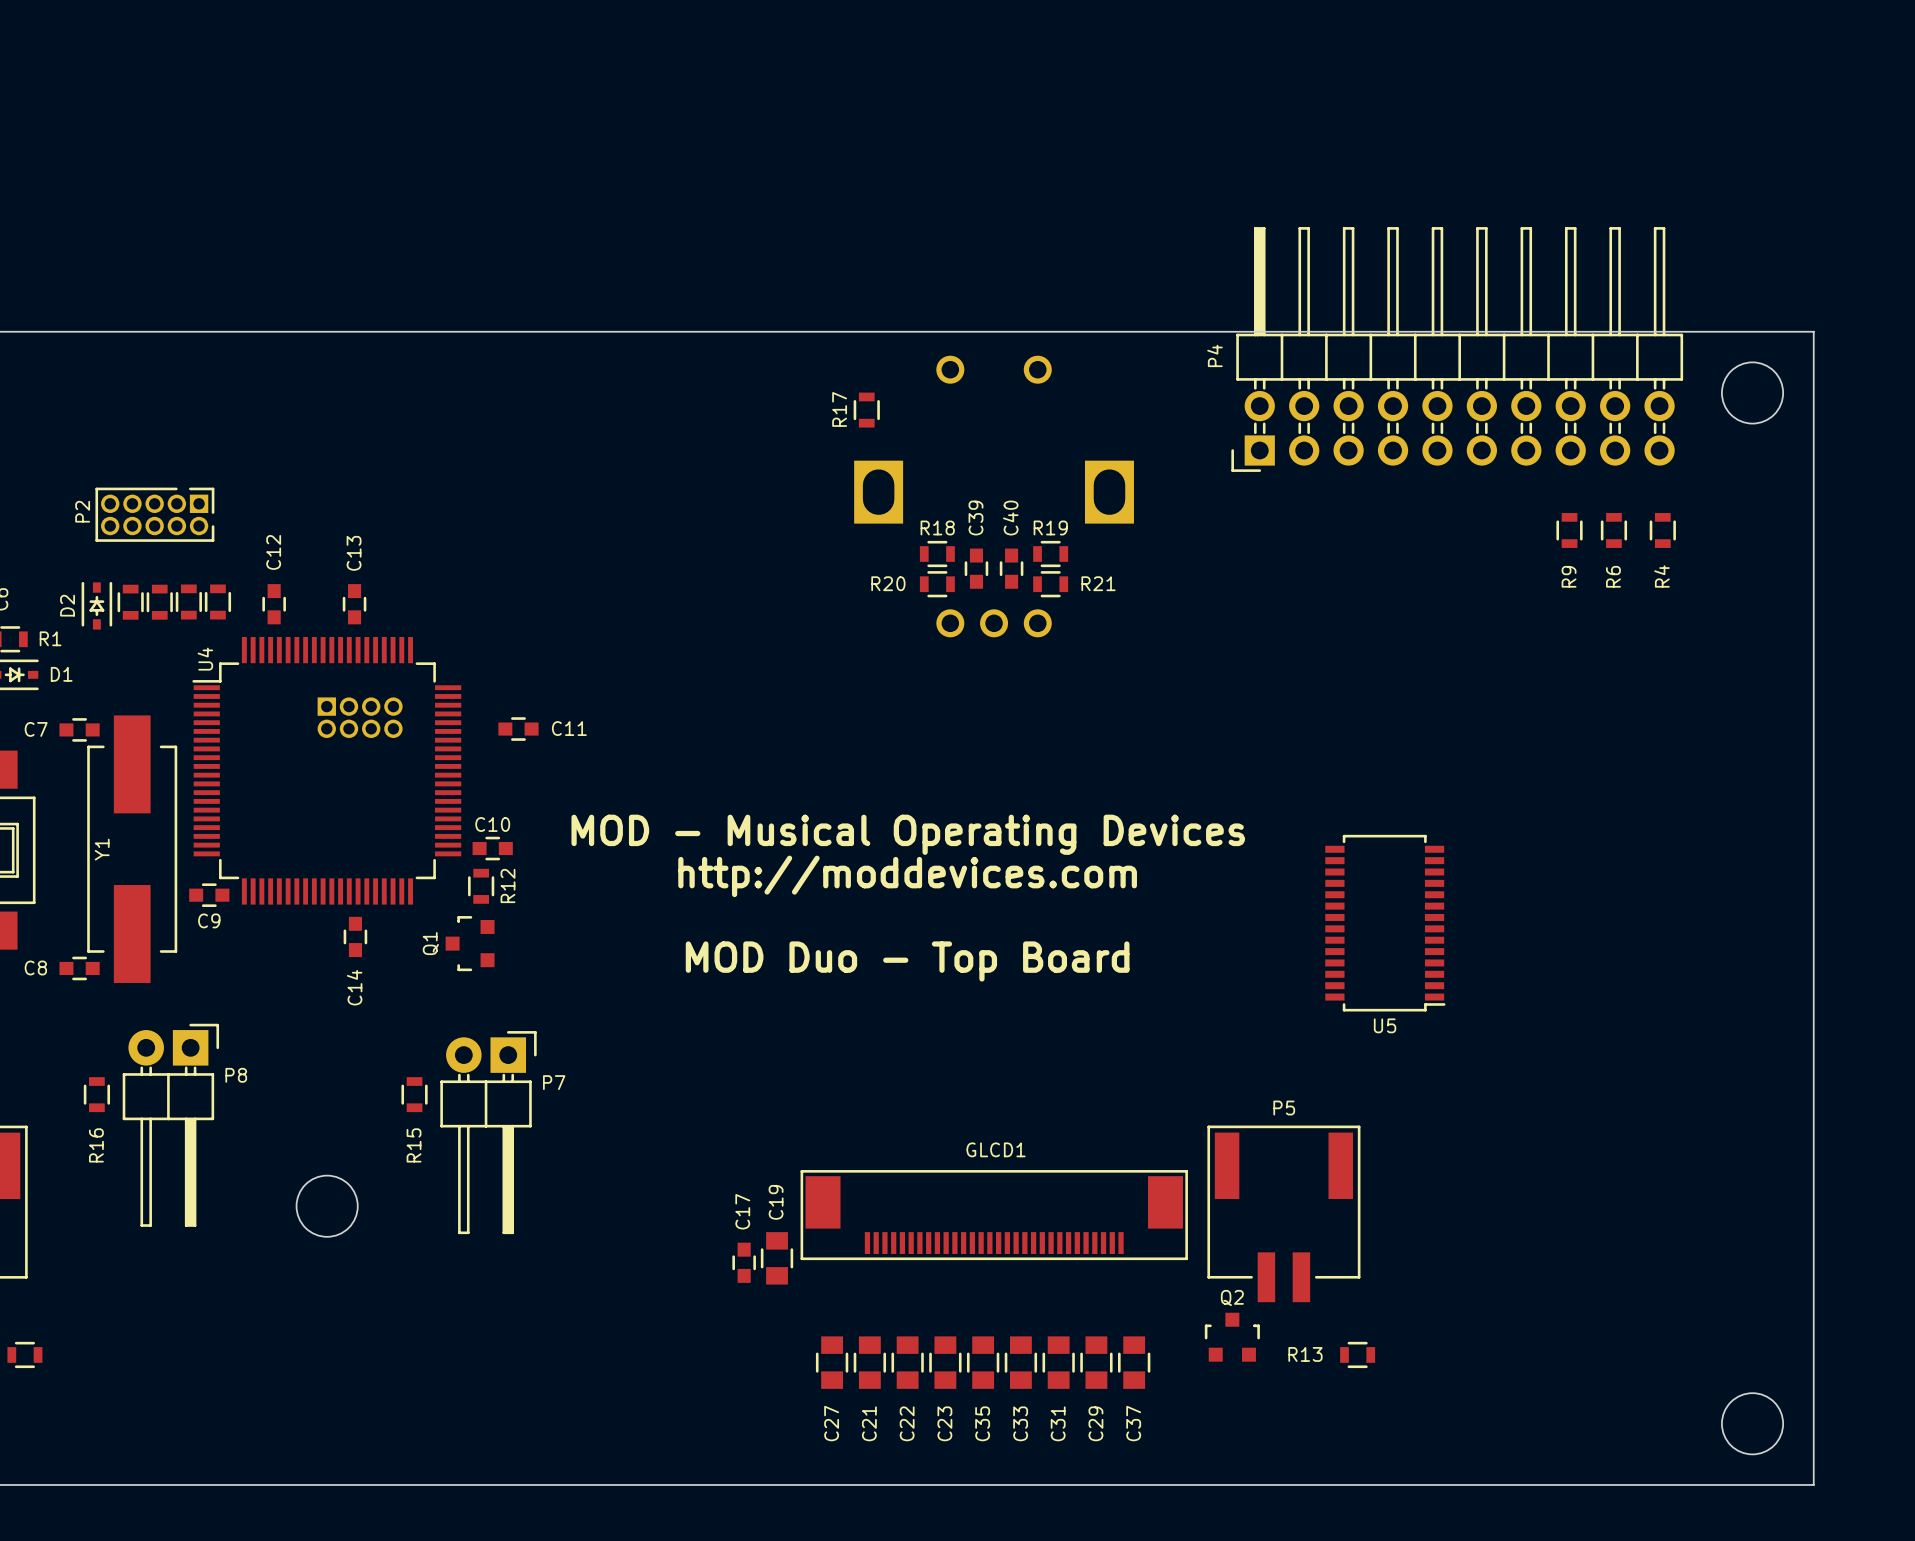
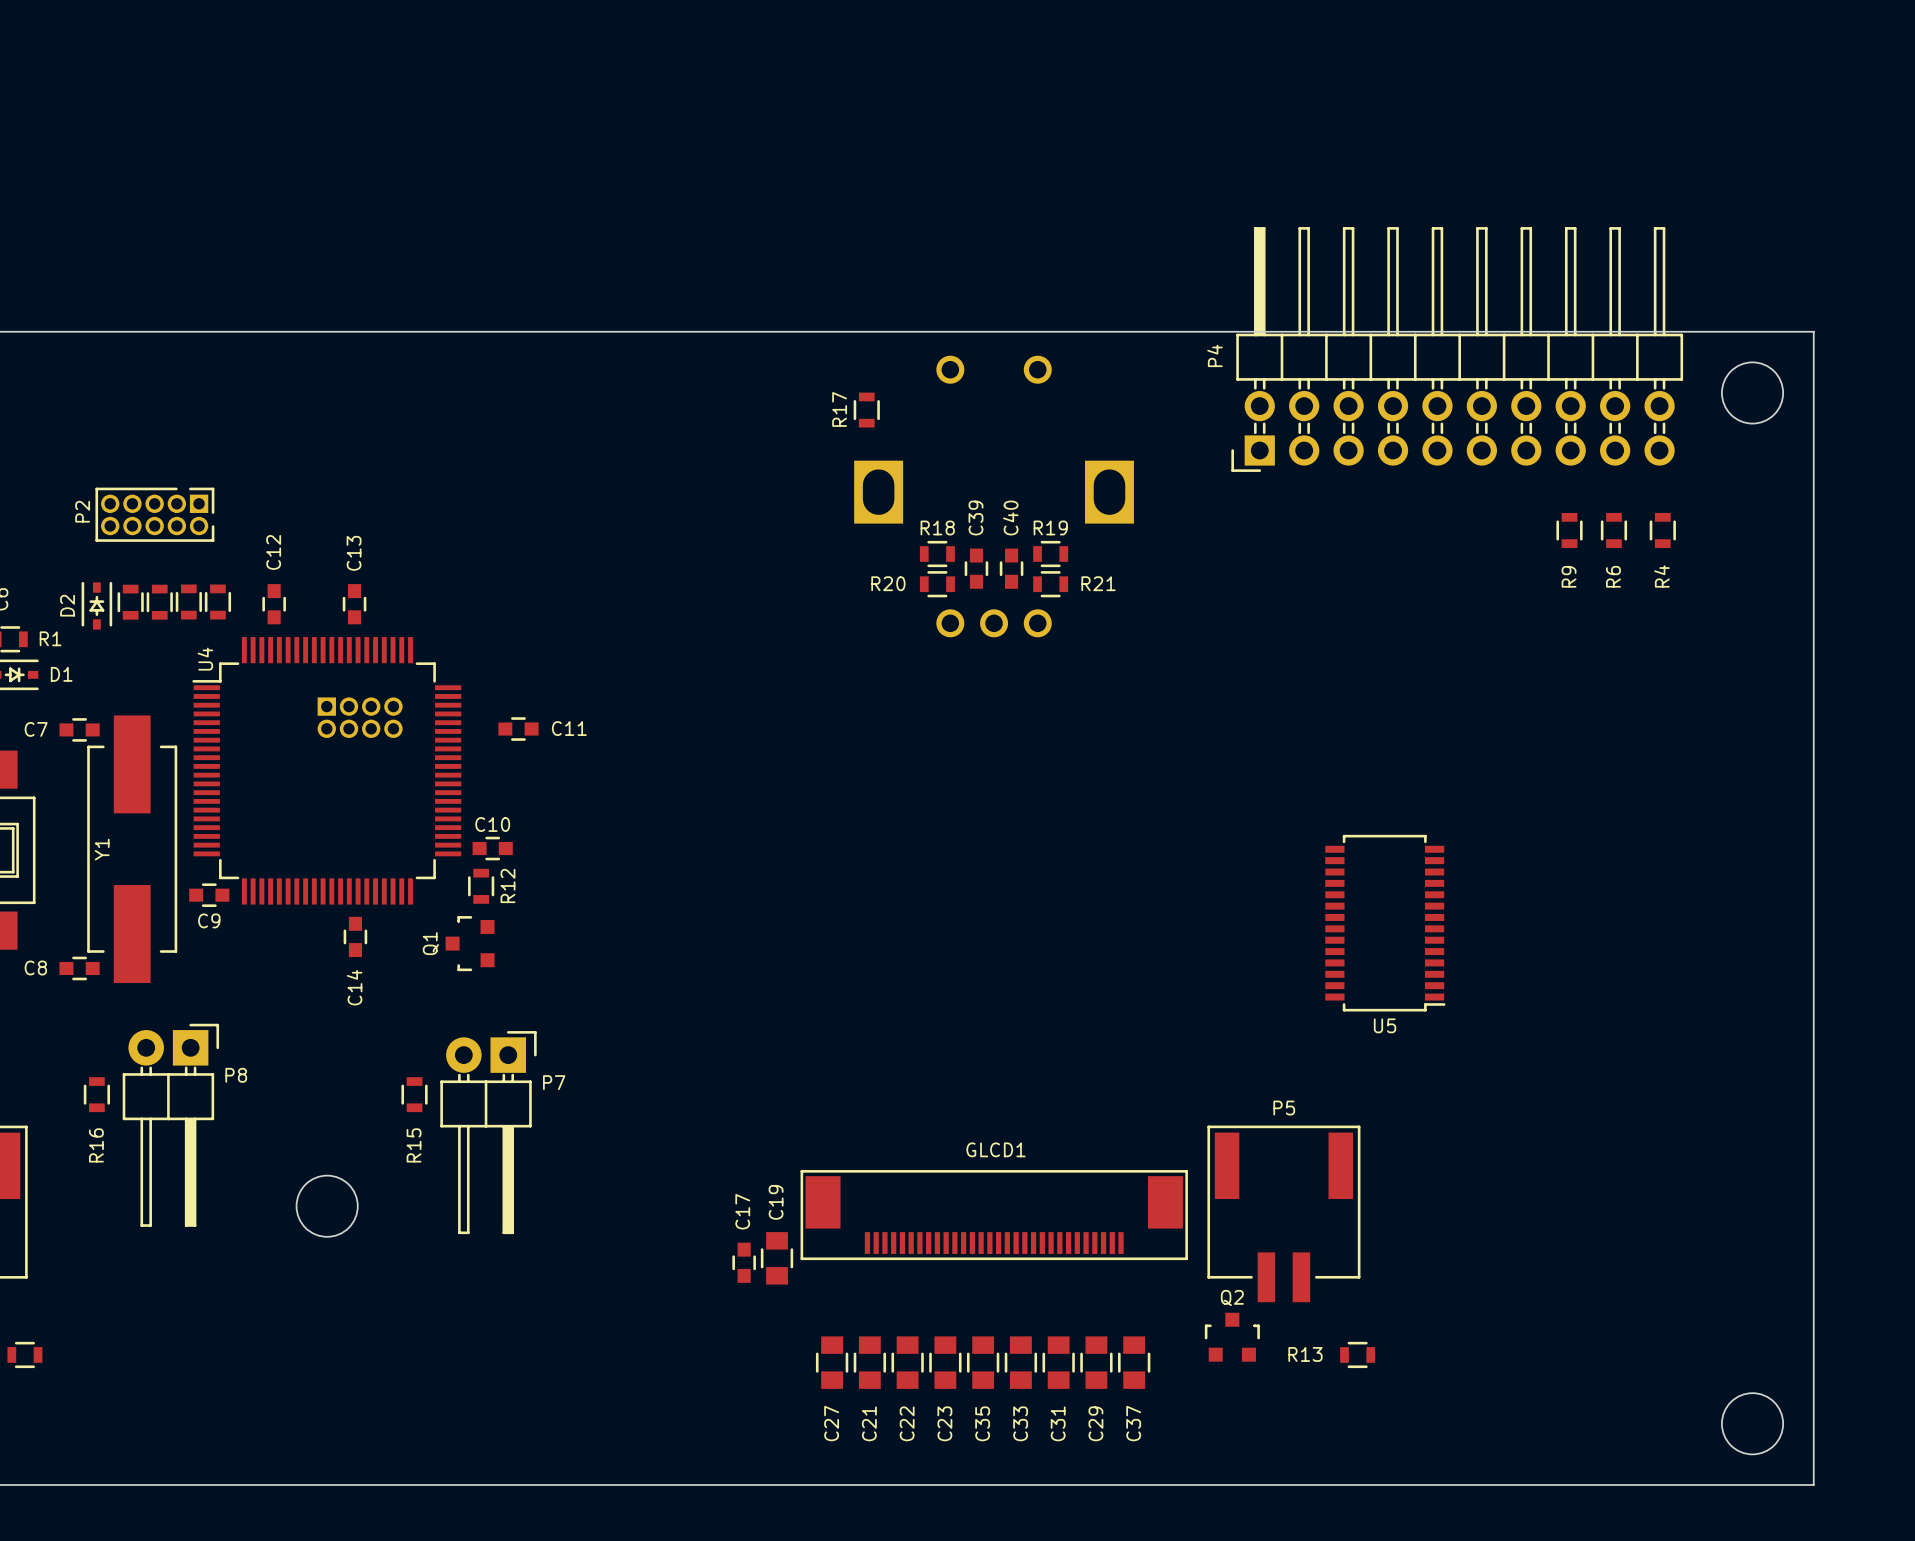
text: MOD - Musical Operating Devices (908, 834) -> none
text: http://moddevices.com (907, 876) -> none
text: MOD Duo - Top Board (907, 961) -> none

